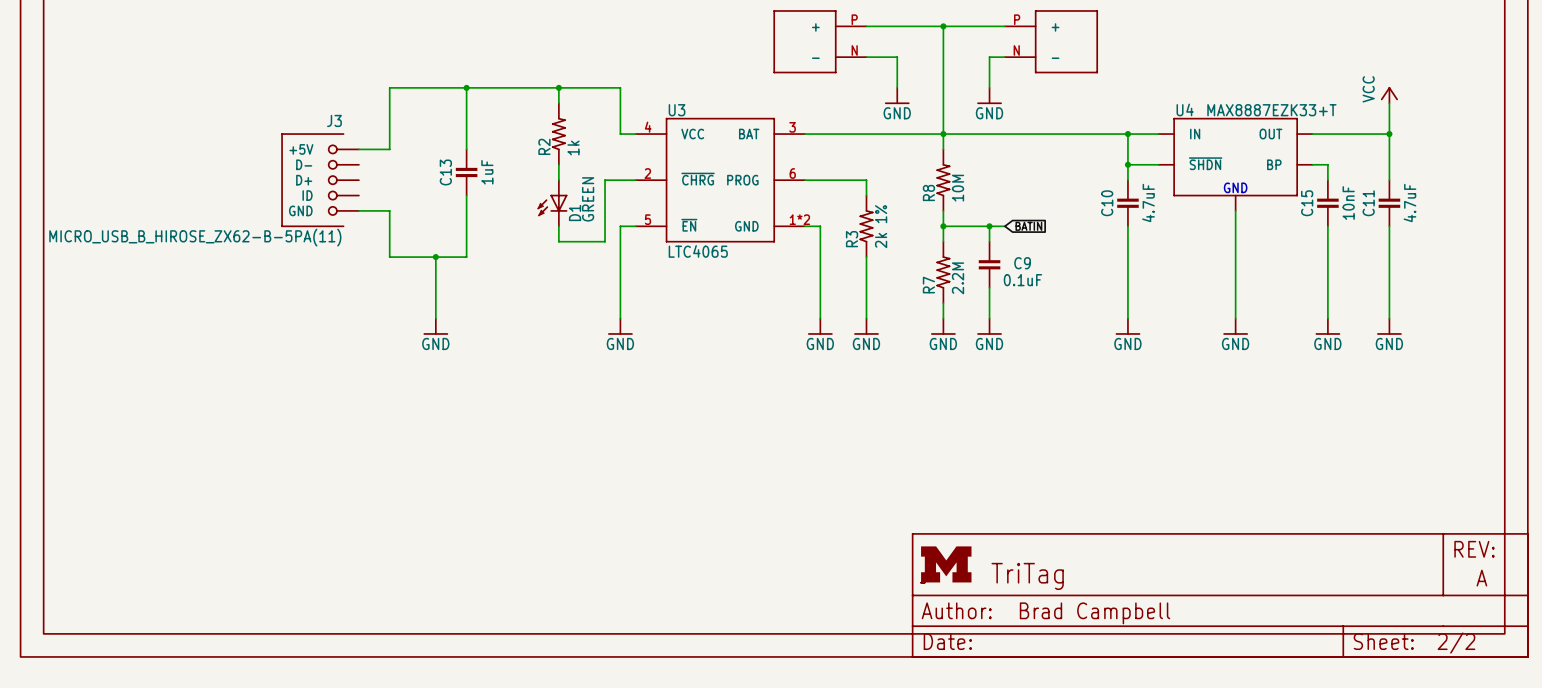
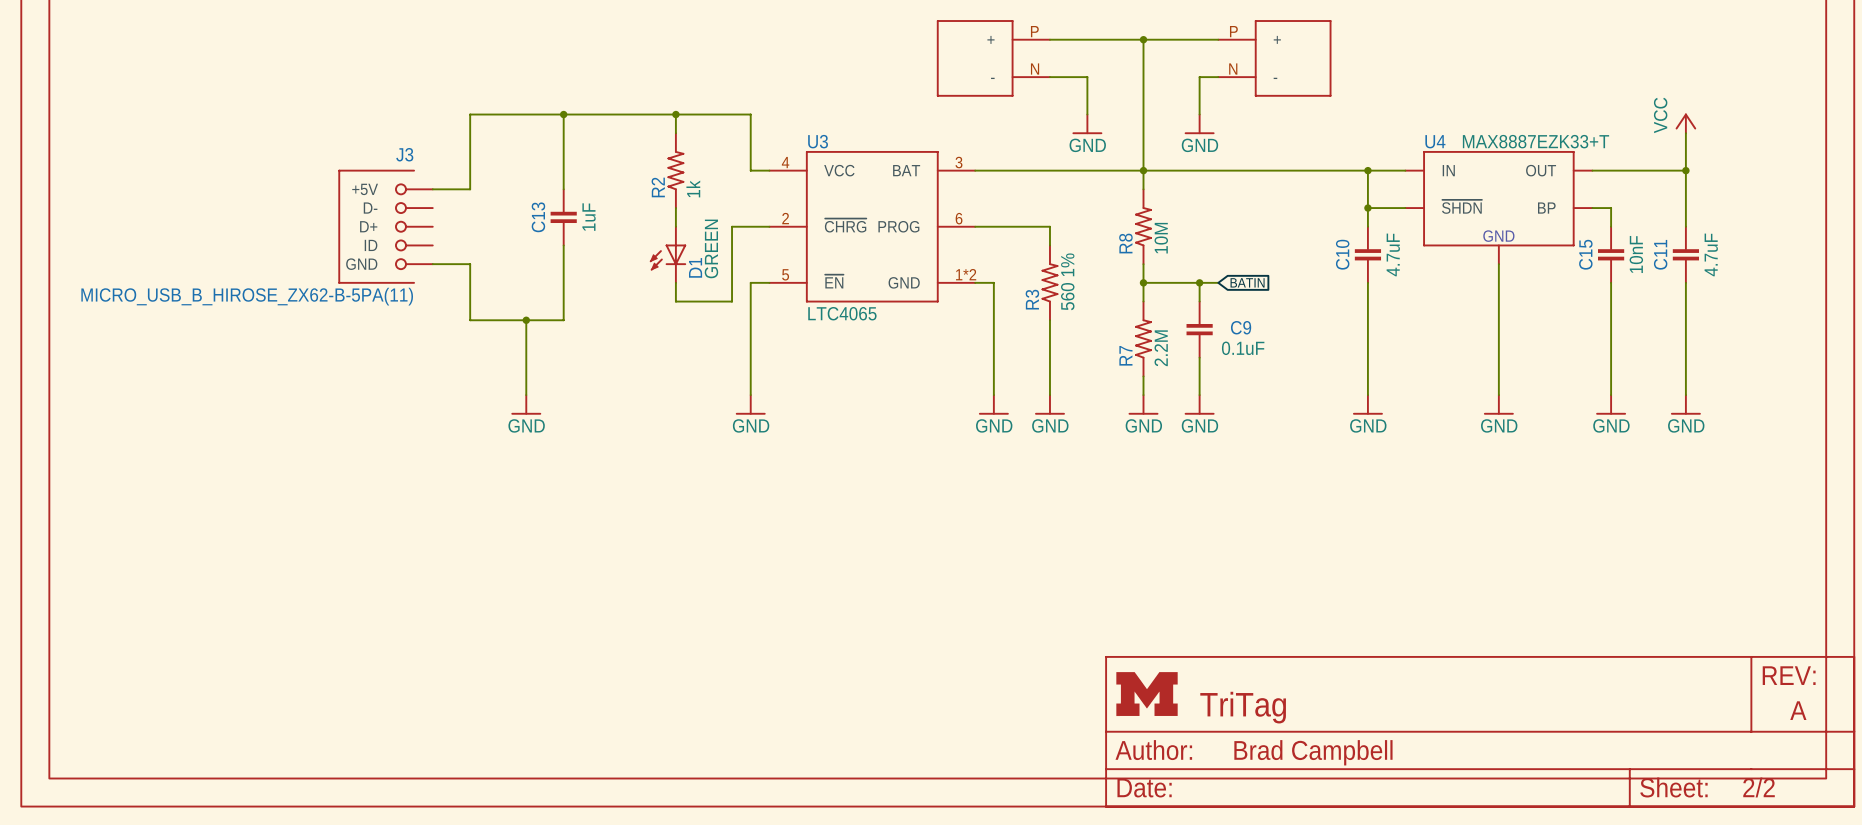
R3 value: 2k 1% (881, 226) -> 560 1% (1067, 281)

